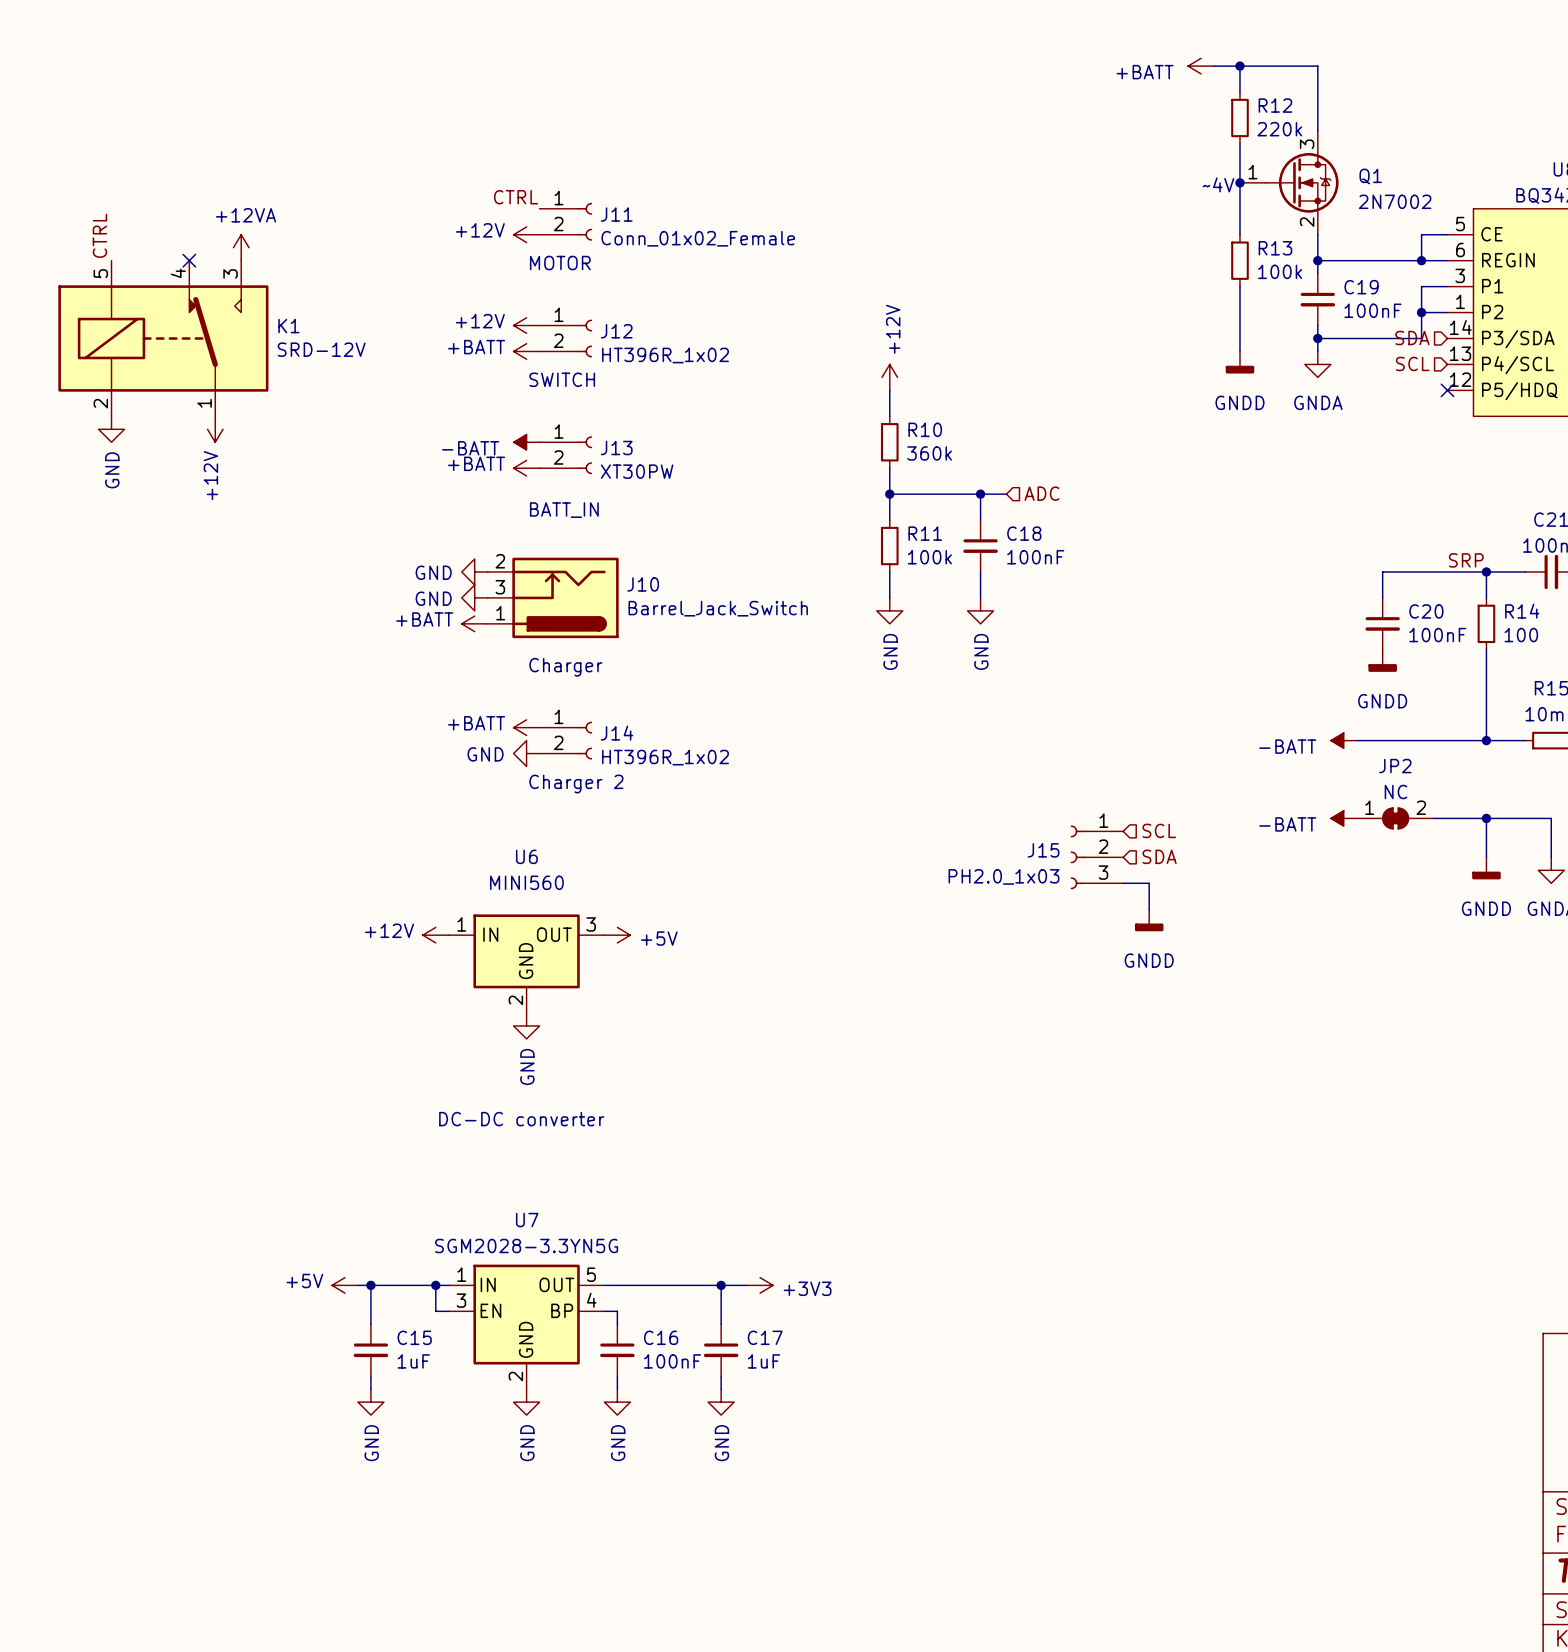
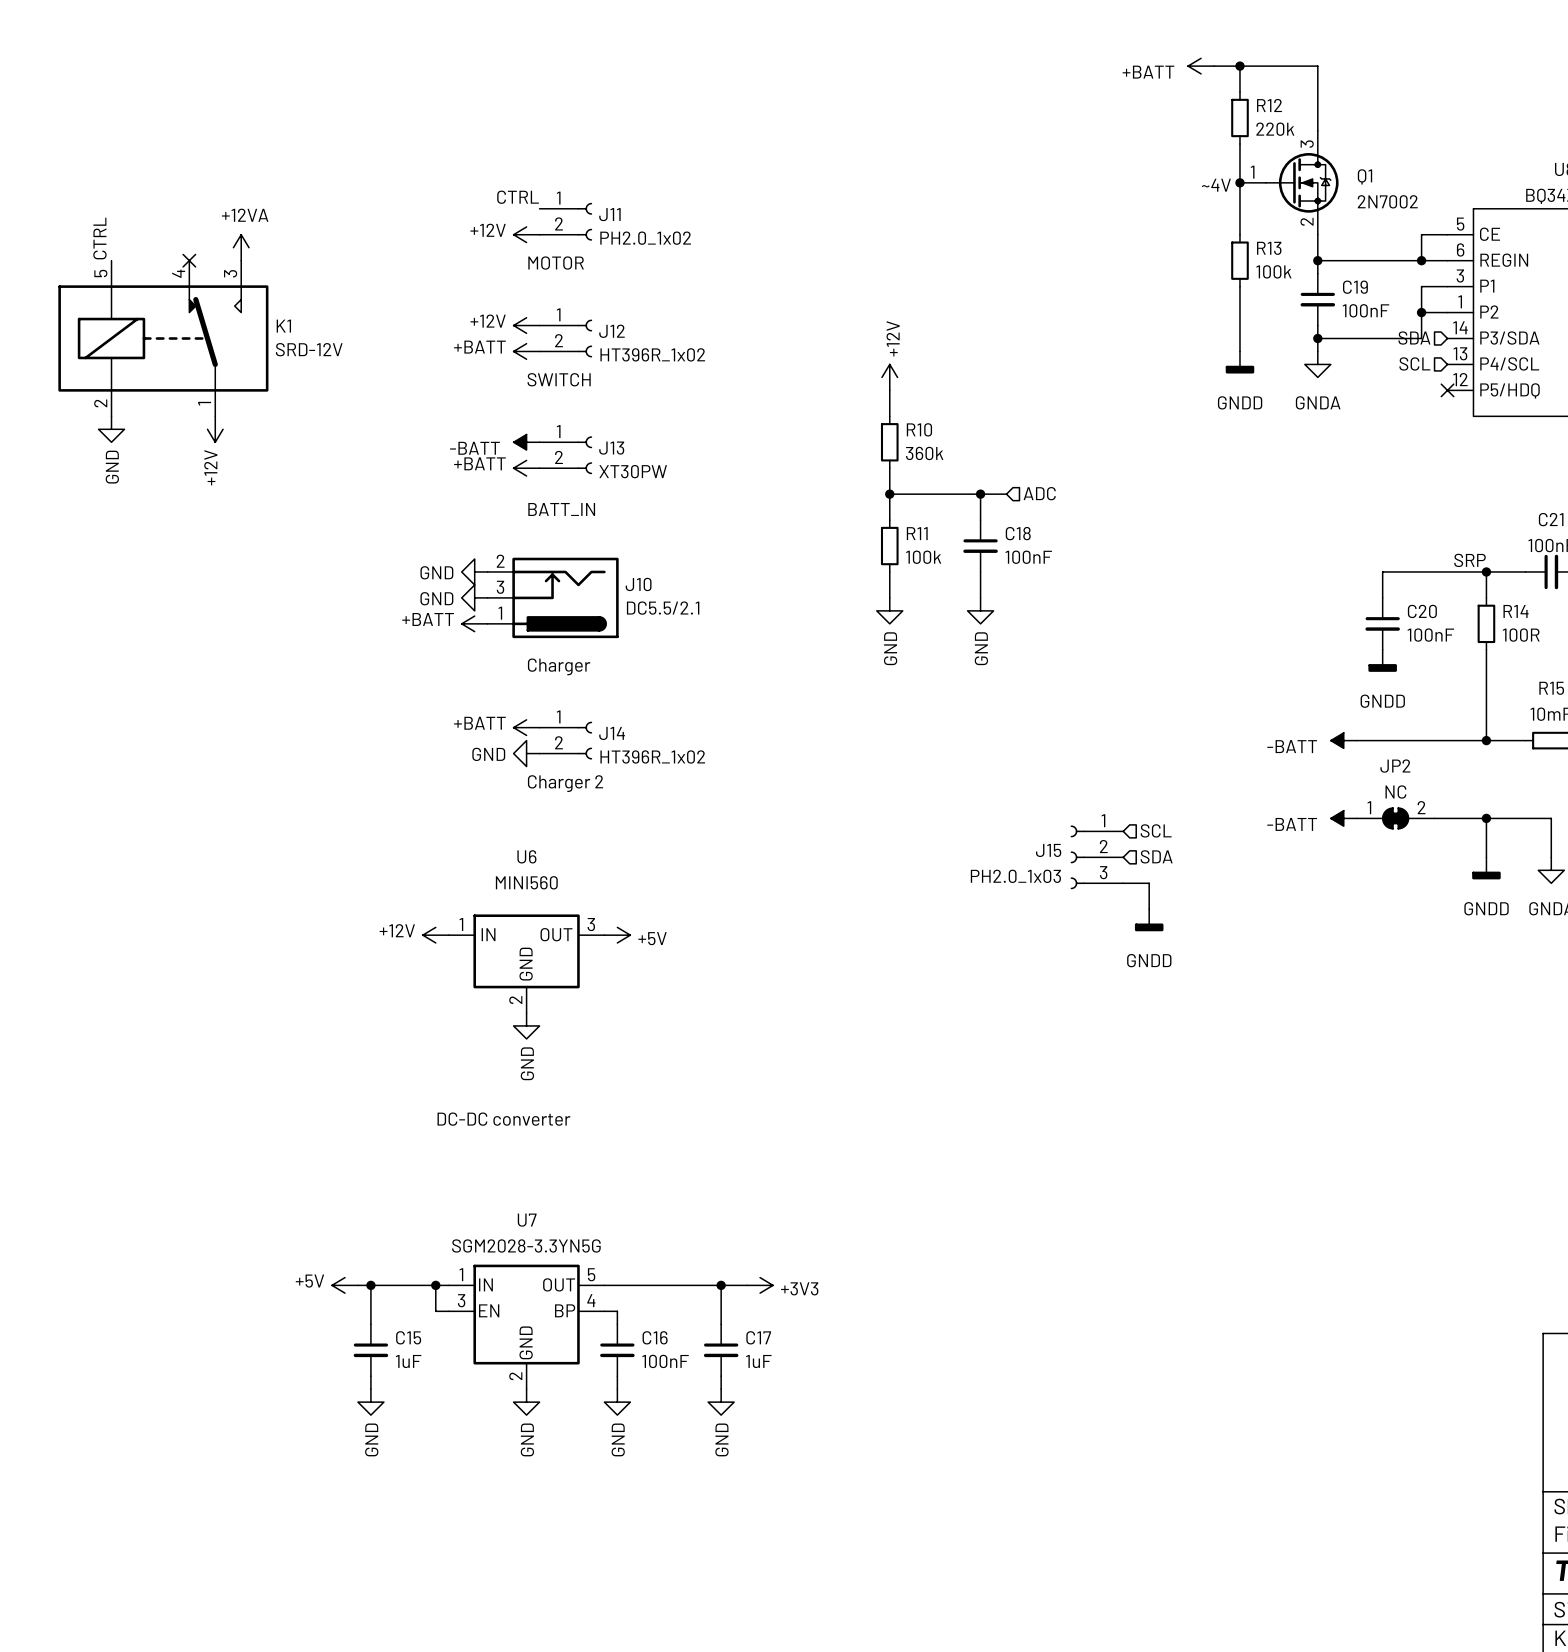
J11 value: Conn_01x02_Female (698, 238) -> PH2.0_1x02 (645, 238)
J10 value: Barrel_Jack_Switch (718, 608) -> DC5.5/2.1 (663, 608)
R14 value: 100 (1521, 635) -> 100R (1521, 635)

